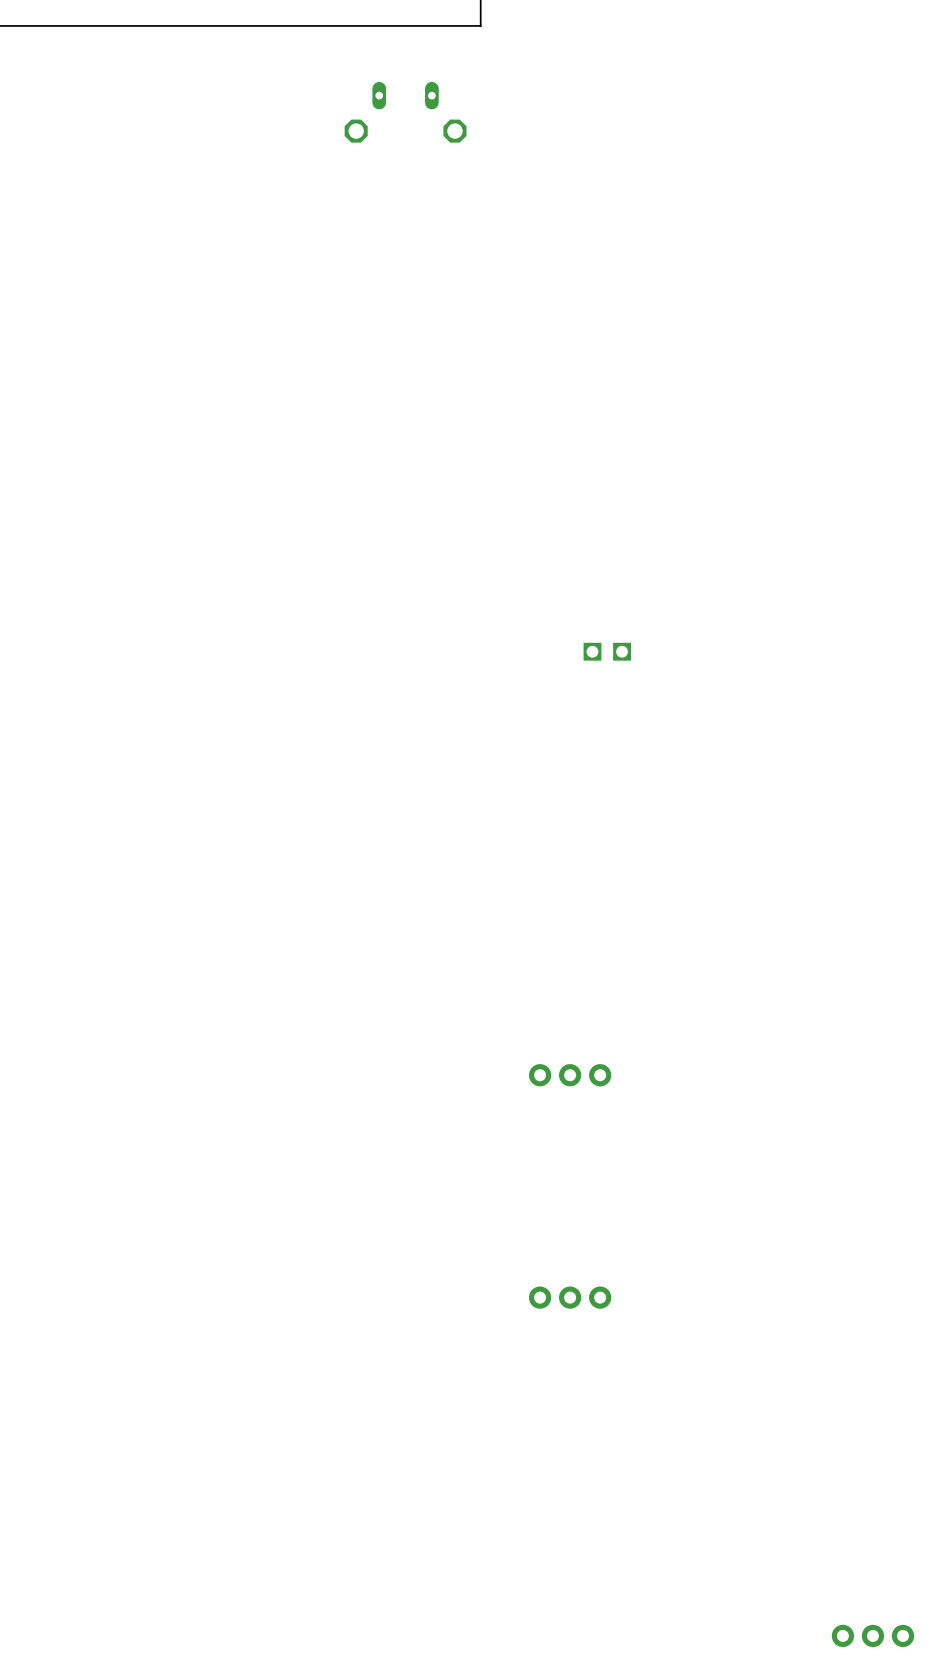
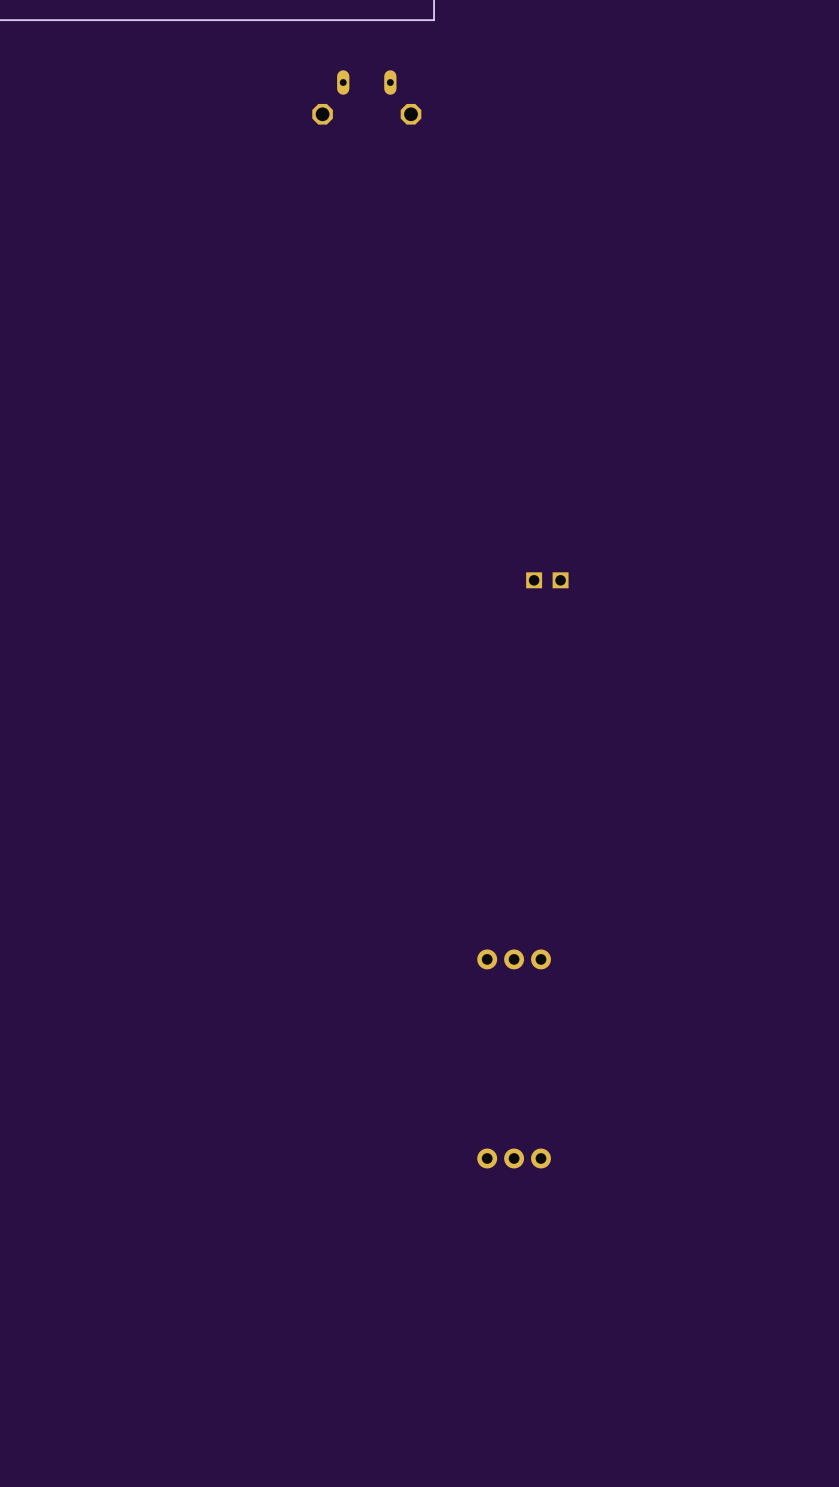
part: (872, 1635) -> none

